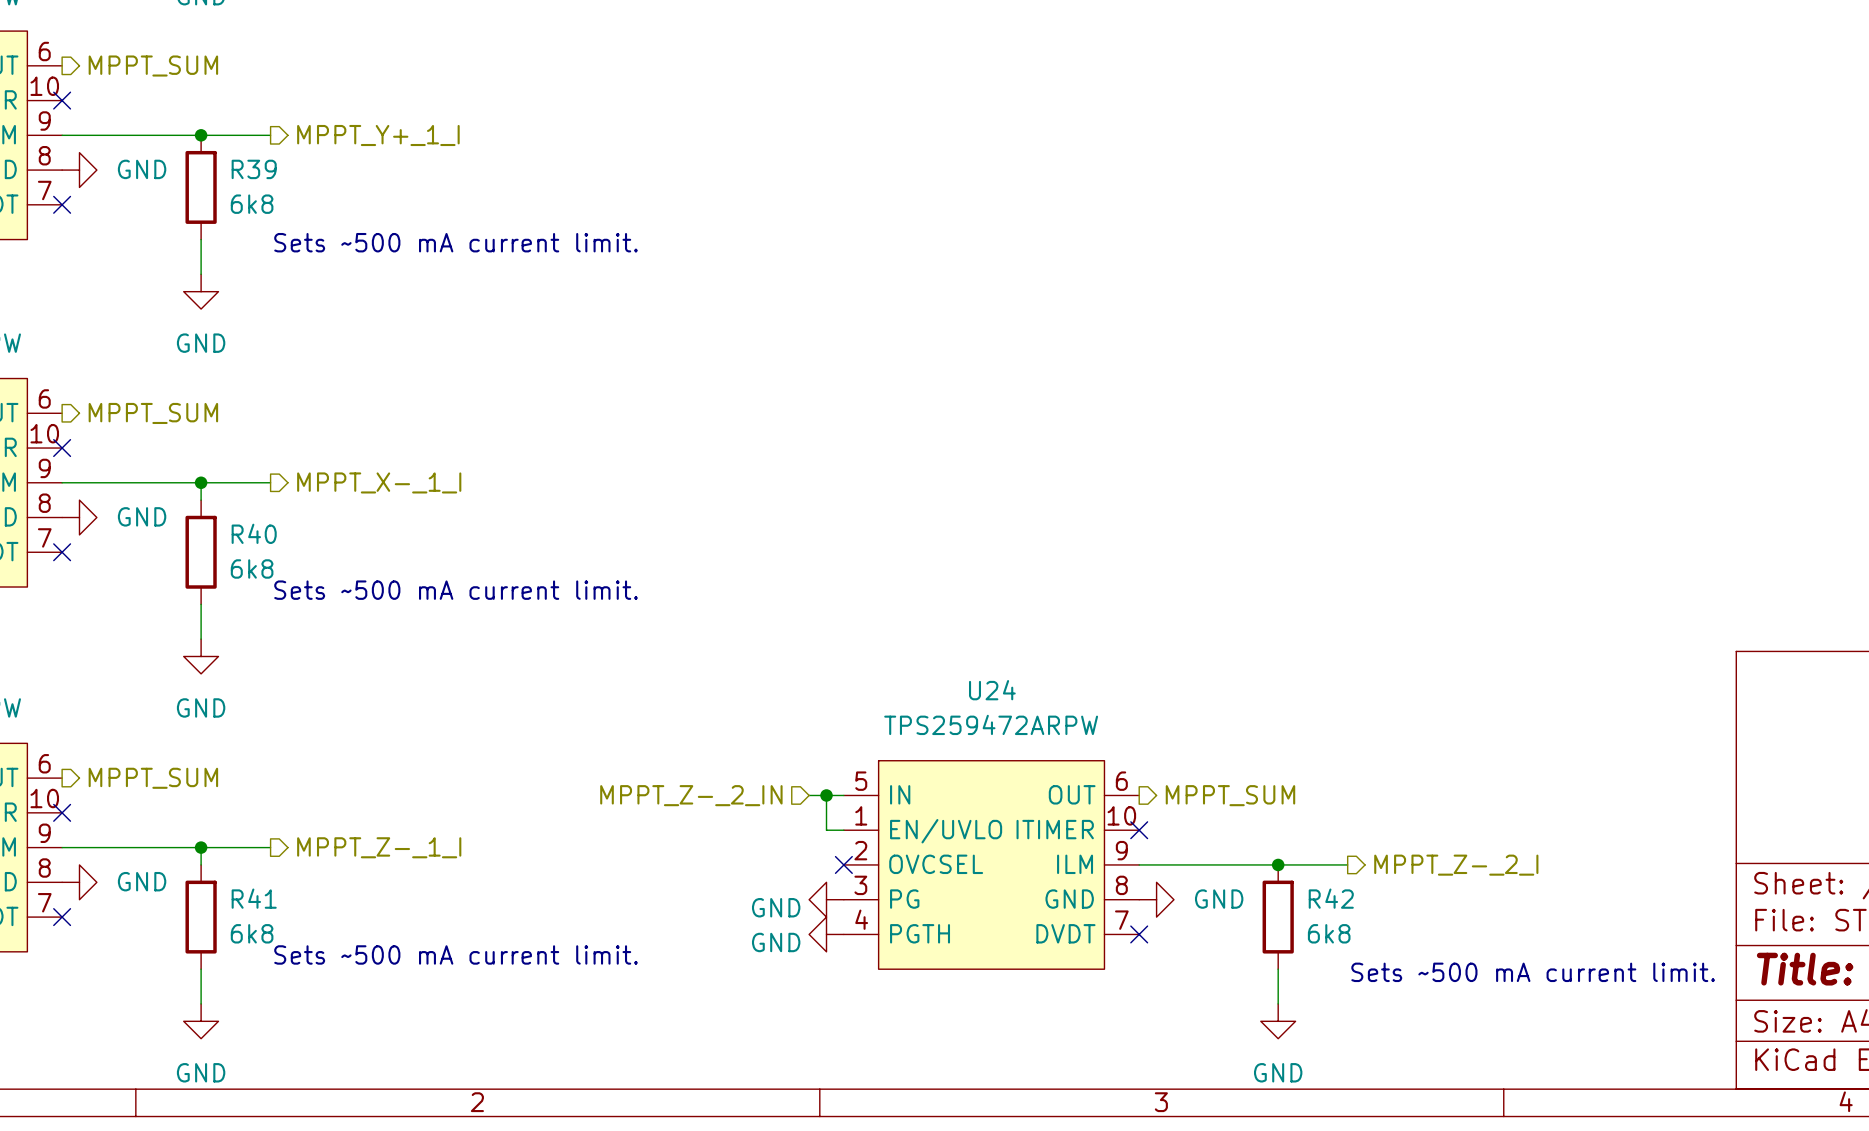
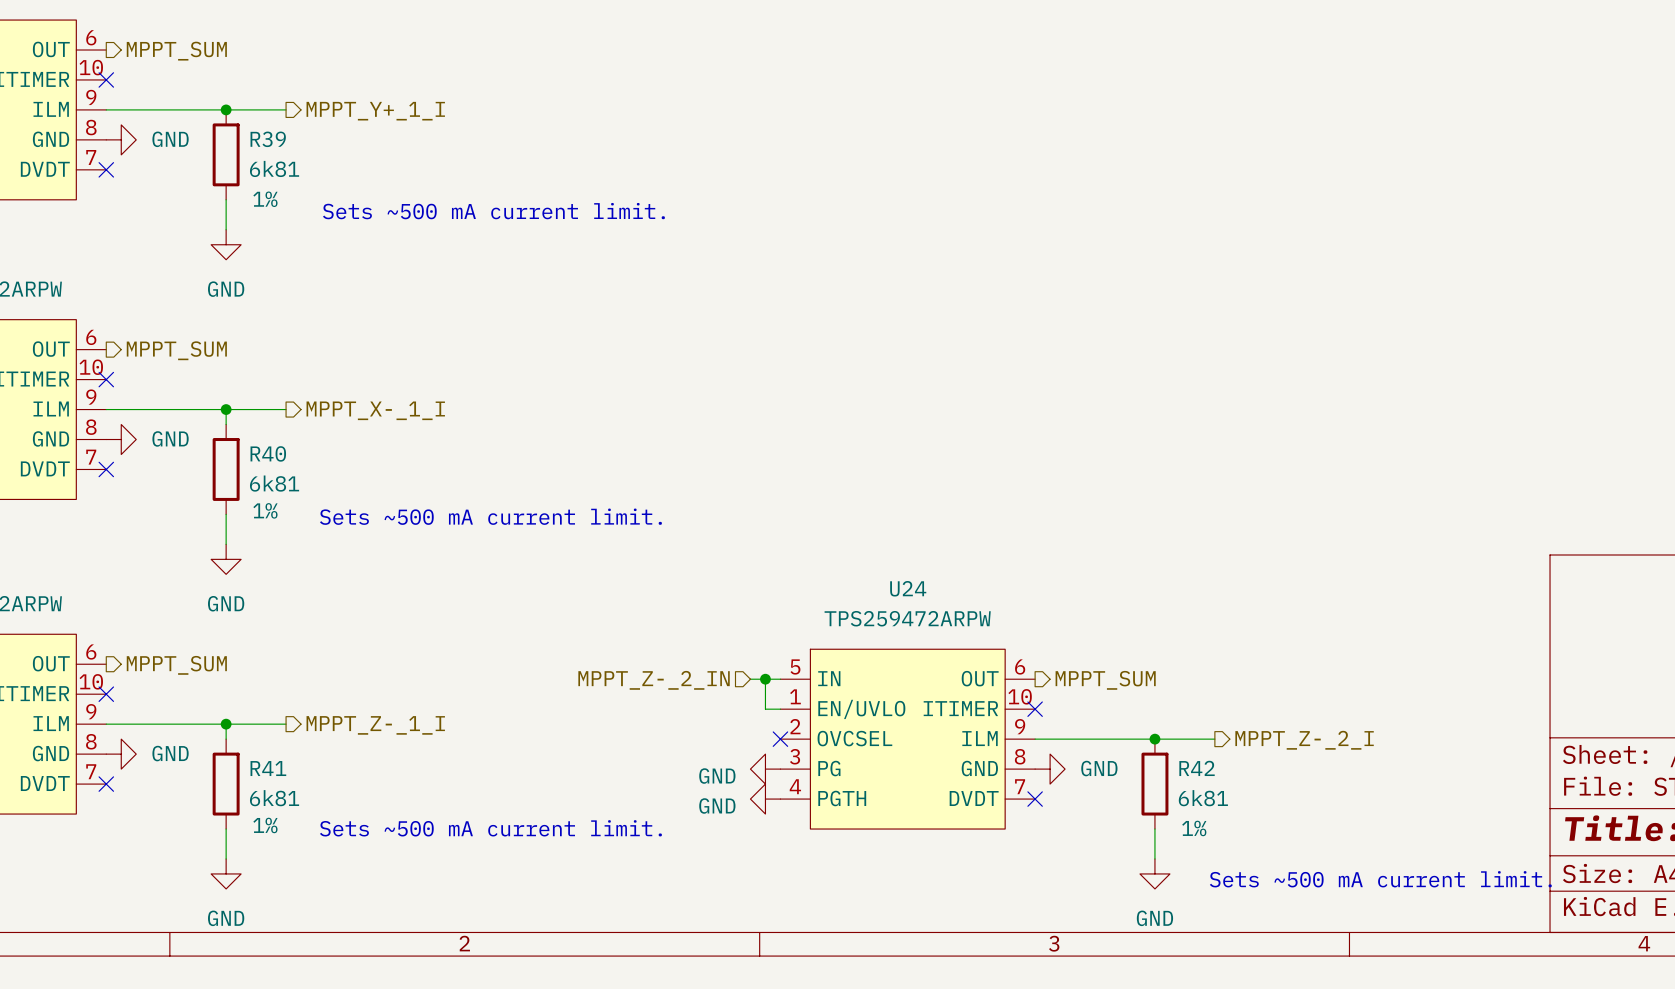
R39 value: 6k8 (252, 204) -> 6k81 (274, 168)
R39 text: none -> 1% (265, 199)
text position: Sets ~500 mA current limit. (456, 242) -> Sets ~500 mA current limit. (493, 211)
R40 value: 6k8 (252, 568) -> 6k81 (274, 483)
text position: Sets ~500 mA current limit. (456, 590) -> Sets ~500 mA current limit. (490, 516)
R40 text: none -> 1% (265, 510)
R41 value: 6k8 (252, 933) -> 6k81 (274, 798)
R42 value: 6k8 (1329, 933) -> 6k81 (1203, 798)
text position: Sets ~500 mA current limit. (456, 954) -> Sets ~500 mA current limit. (490, 828)
R41 text: none -> 1% (265, 825)
R42 text: none -> 1% (1194, 828)
text position: Sets ~500 mA current limit. (1533, 972) -> Sets ~500 mA current limit. (1380, 879)

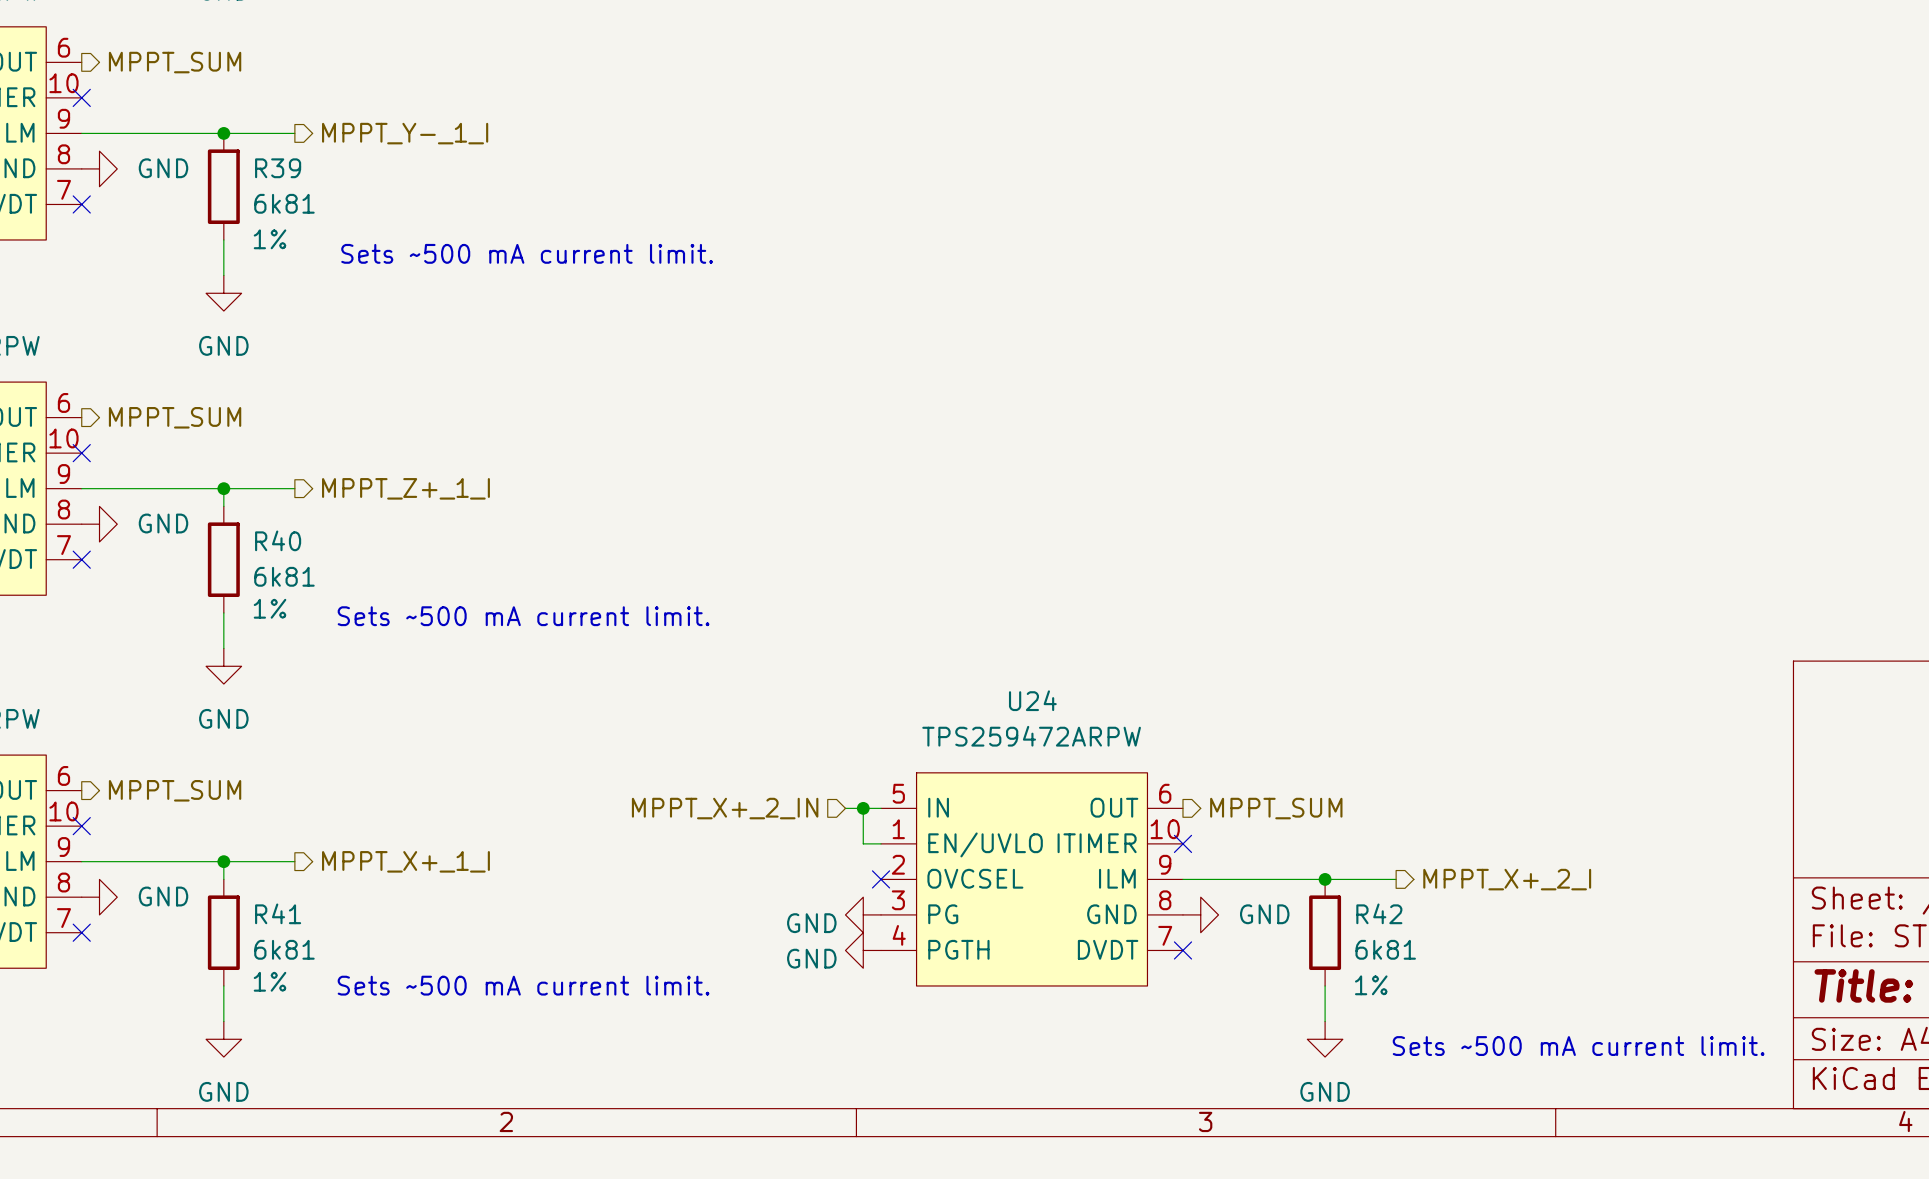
hierarchical label: MPPT_Y+_1_I (375, 111) -> MPPT_Y-_1_I (405, 133)
hierarchical label: MPPT_X-_1_I (375, 410) -> MPPT_Z+_1_I (405, 488)
hierarchical label: MPPT_Z-_2_IN (654, 680) -> MPPT_X+_2_IN (725, 808)
hierarchical label: MPPT_Z-_1_I (375, 725) -> MPPT_X+_1_I (405, 861)
hierarchical label: MPPT_Z-_2_I (1304, 740) -> MPPT_X+_2_I (1507, 879)

